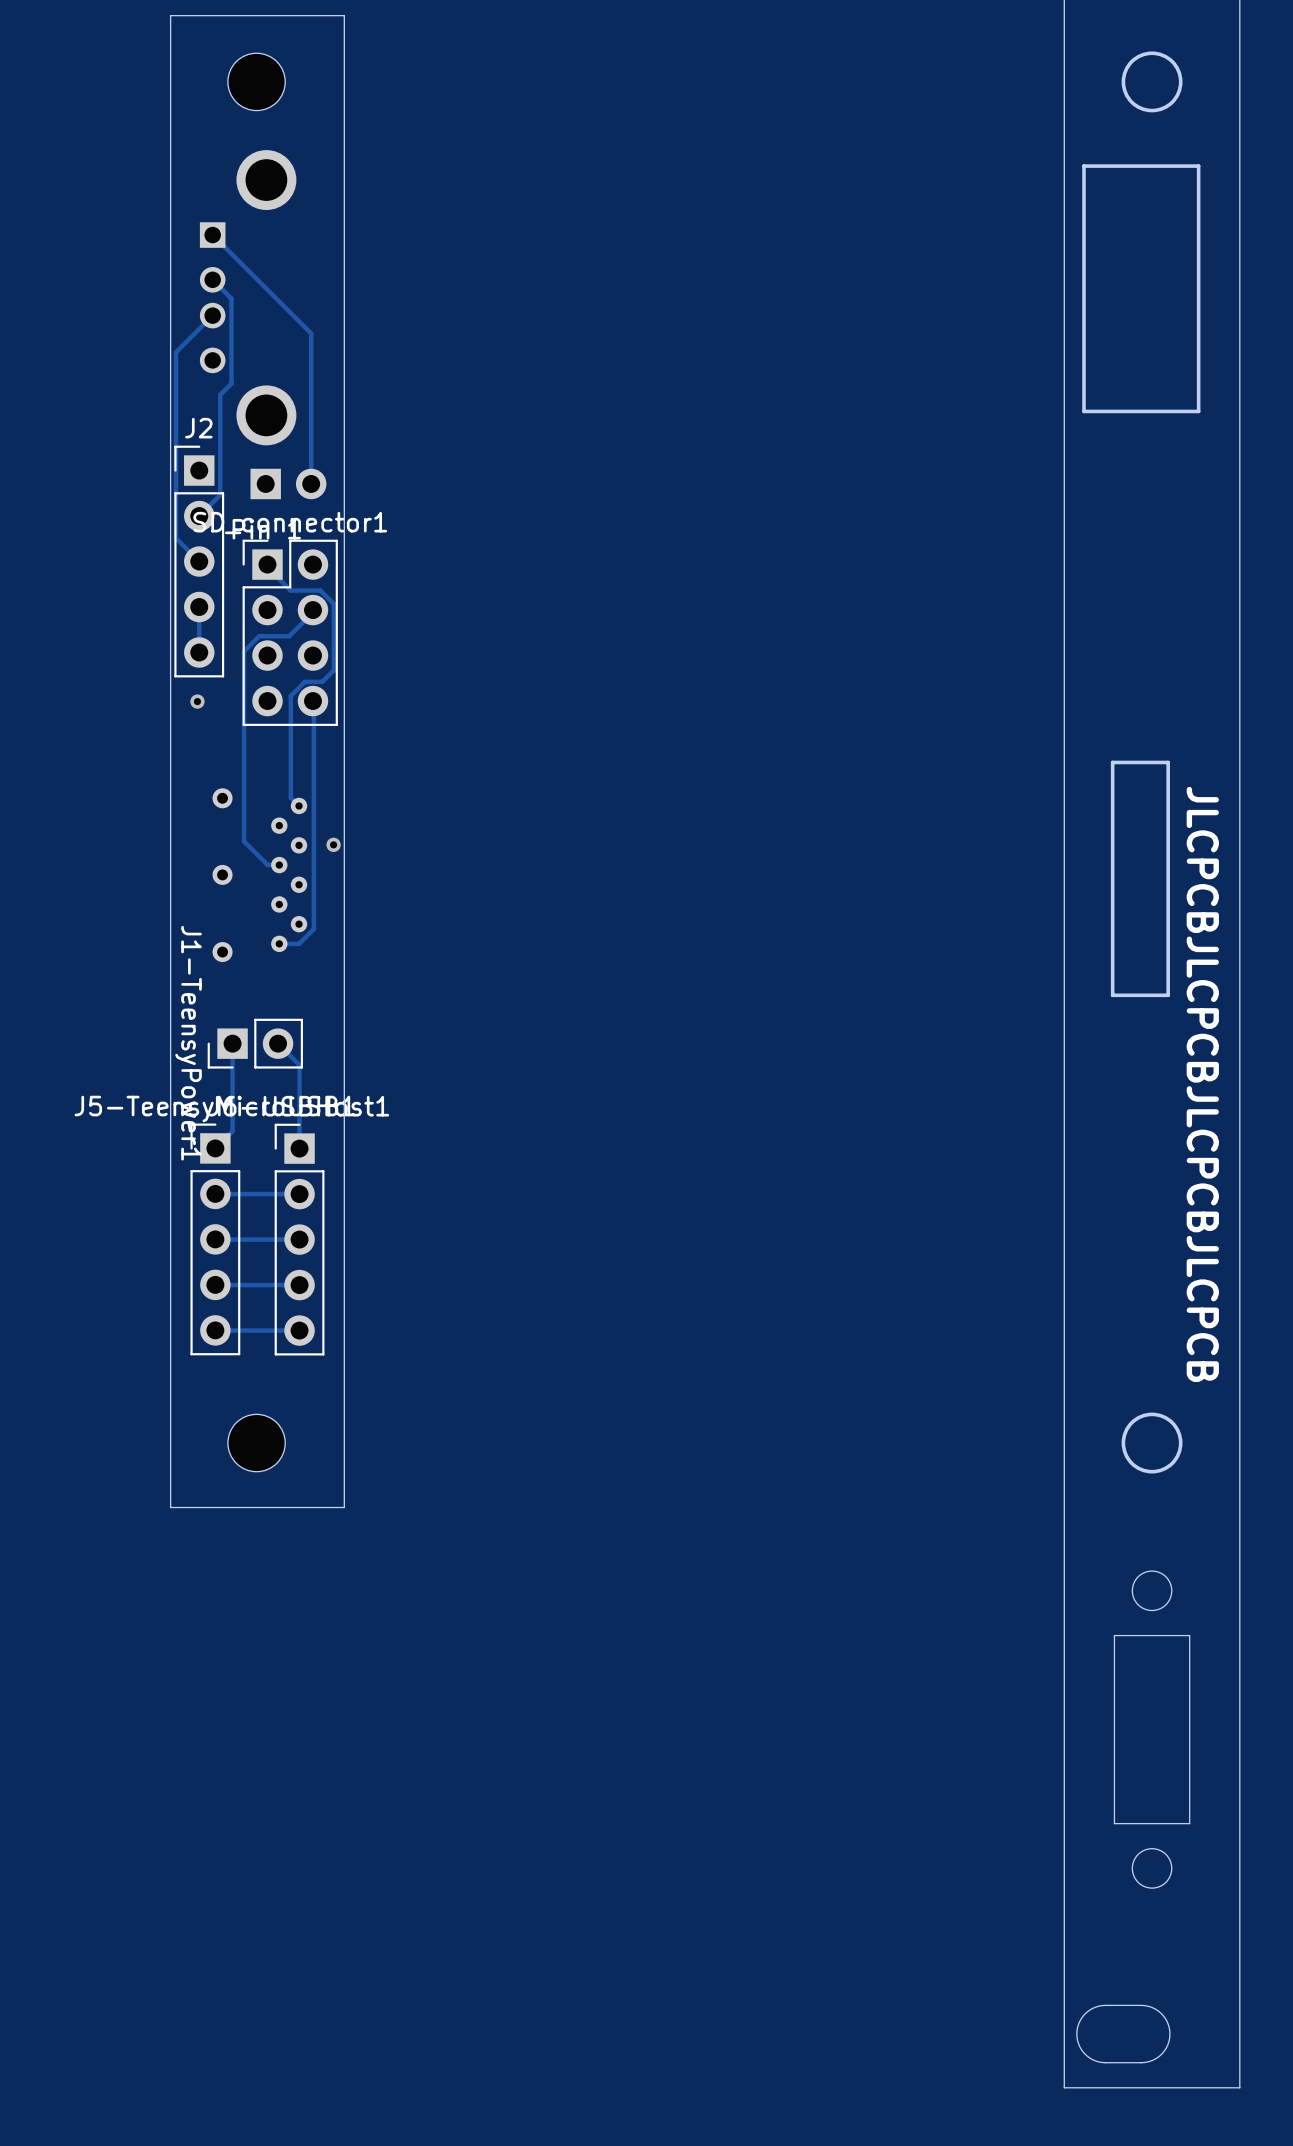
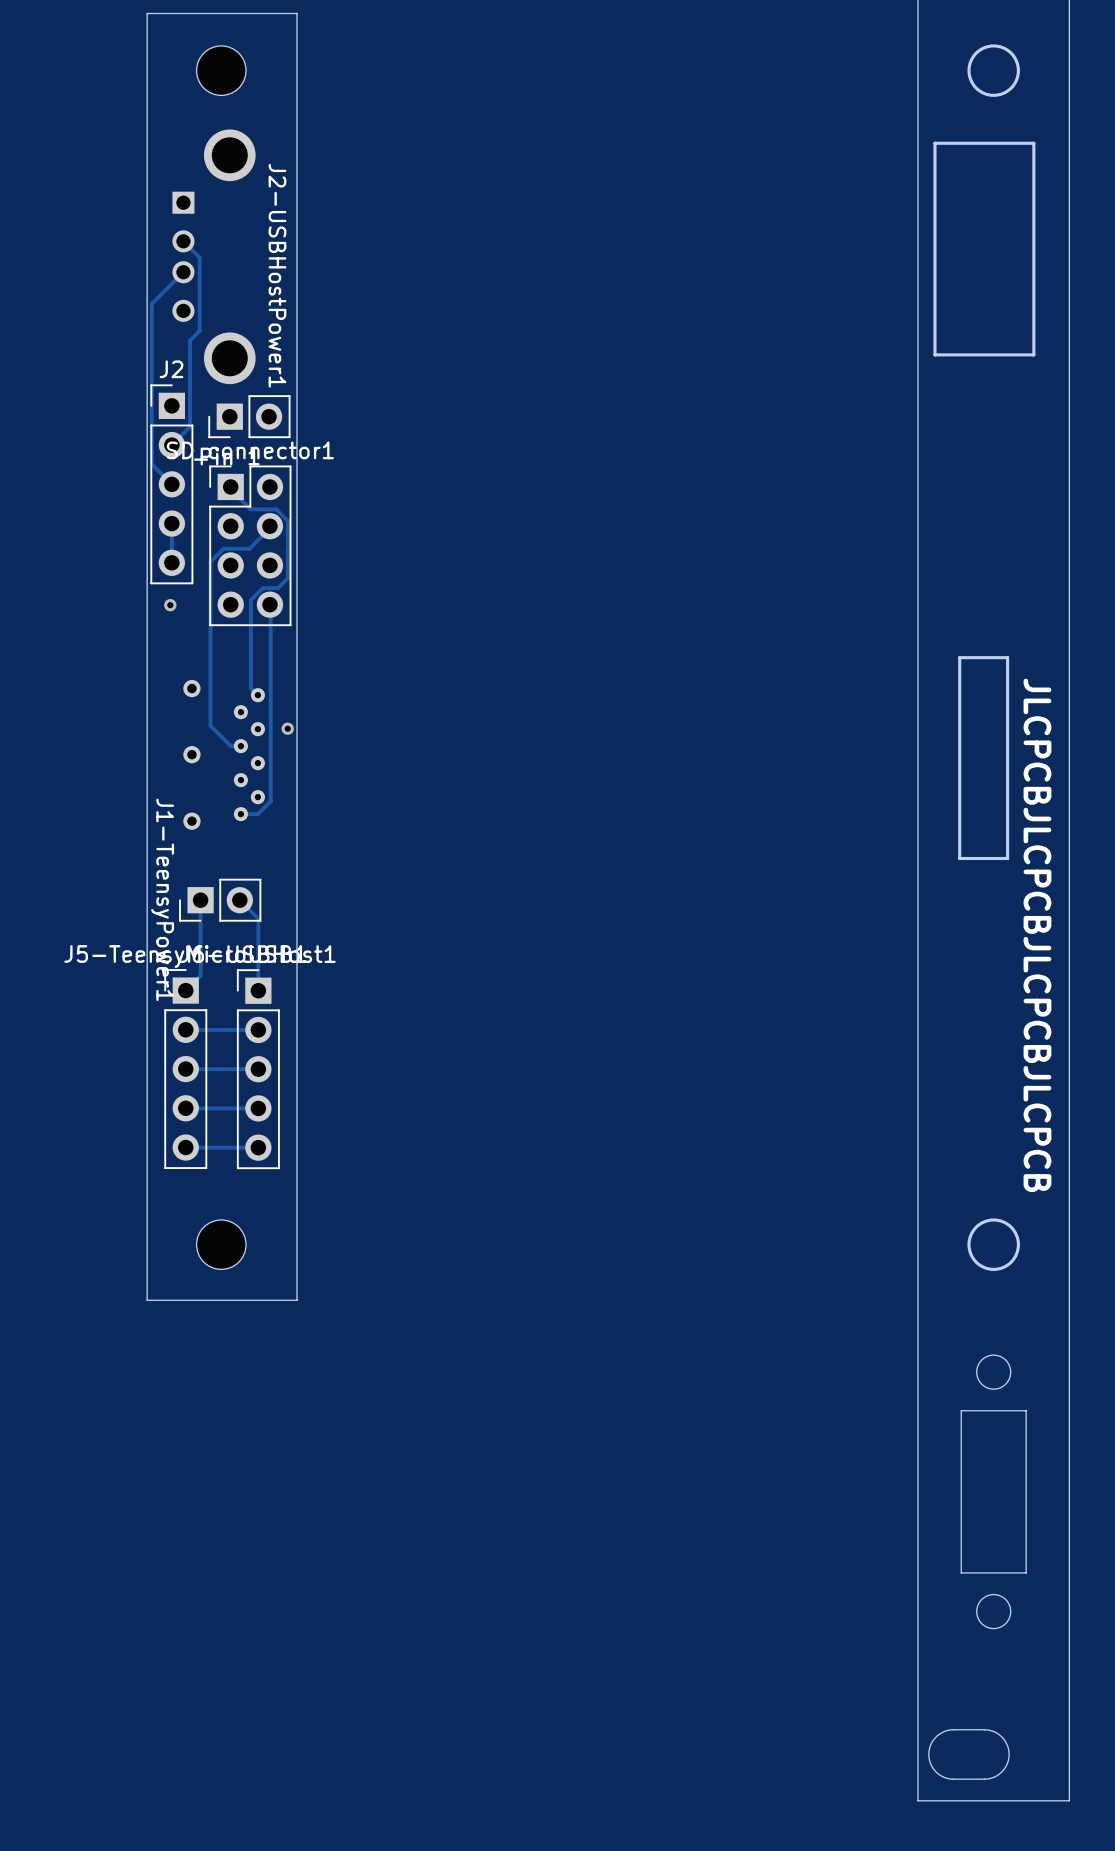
track: (212, 235) (311, 333) (311, 483) -> none
J2-USBHostPower1 side: top (288, 483) -> bottom (249, 416)

